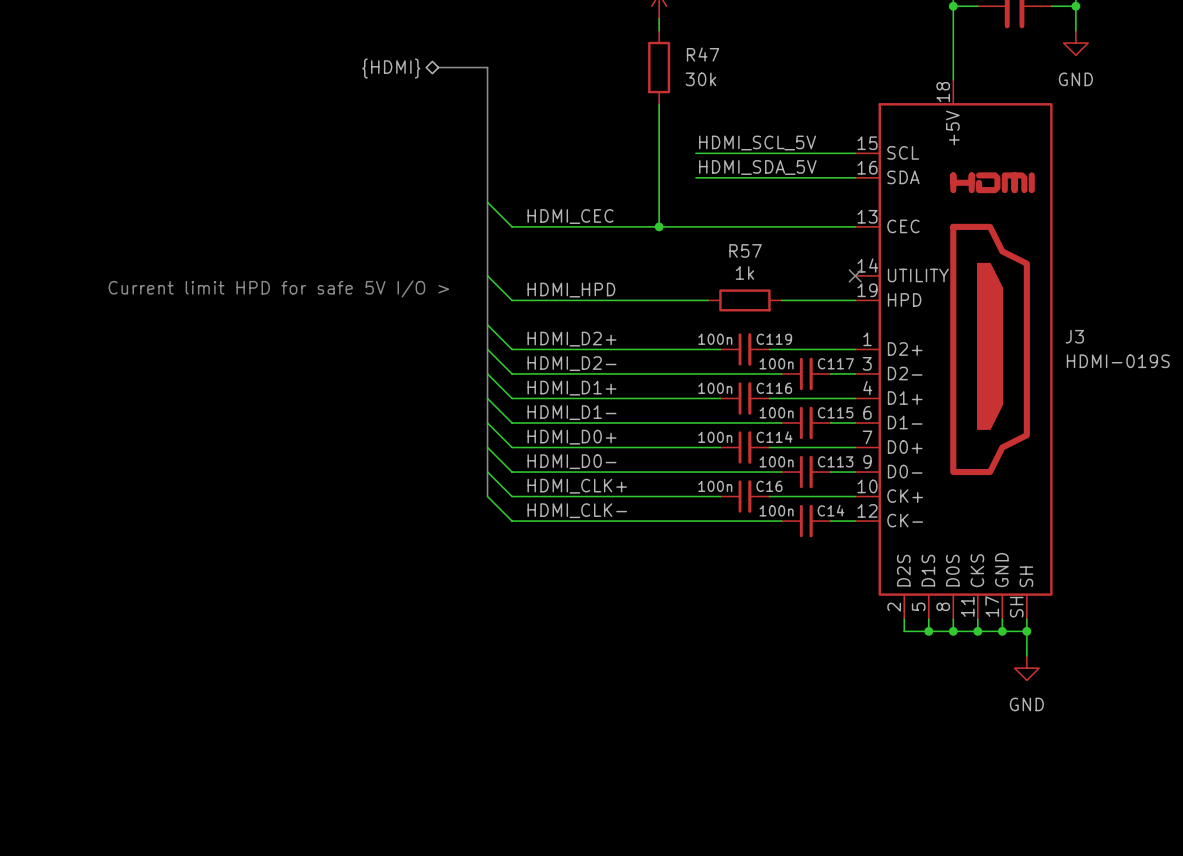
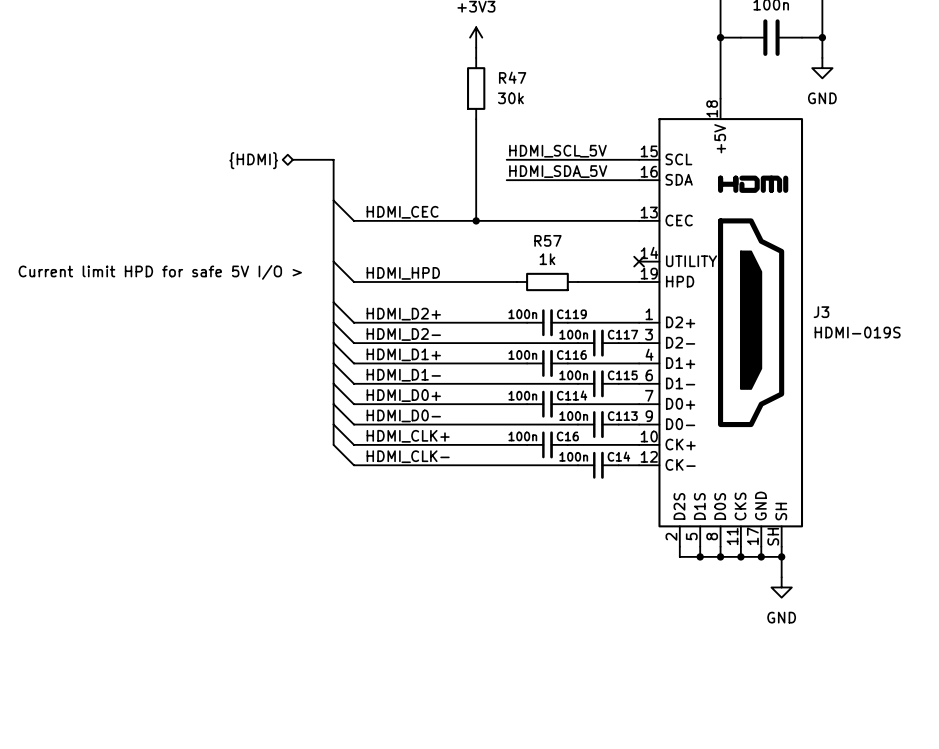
bus: (438, 67) (487, 67) (487, 153) -> (292, 159) (333, 159)
hierarchical label position: {HDMI} (391, 68) -> {HDMI} (253, 160)

